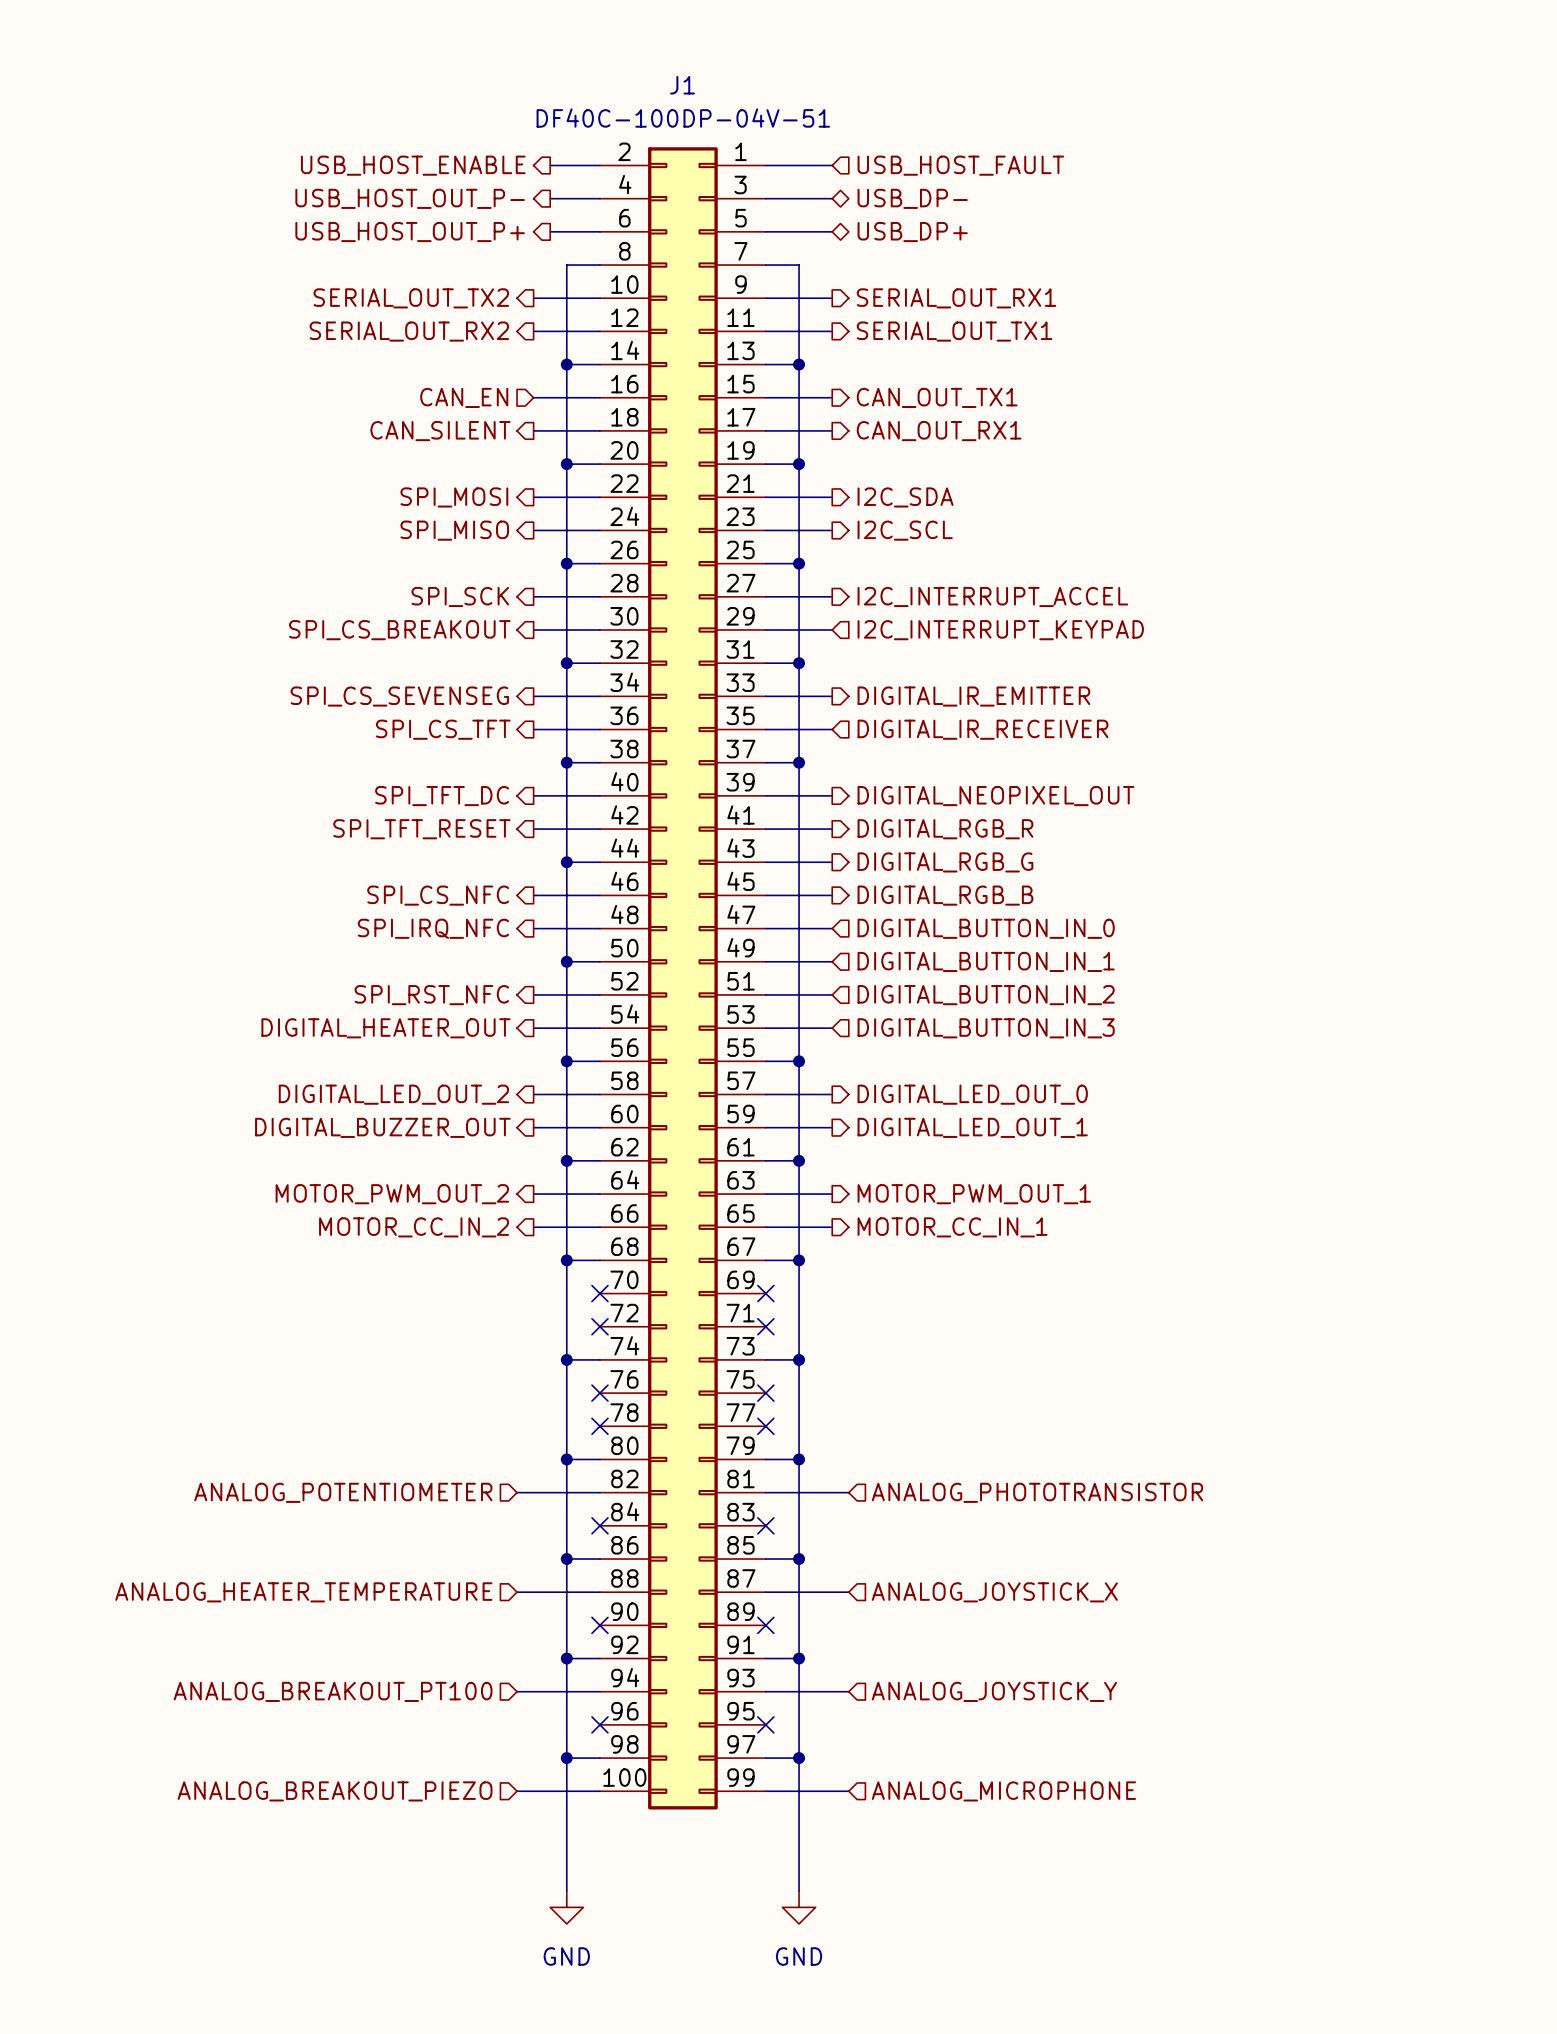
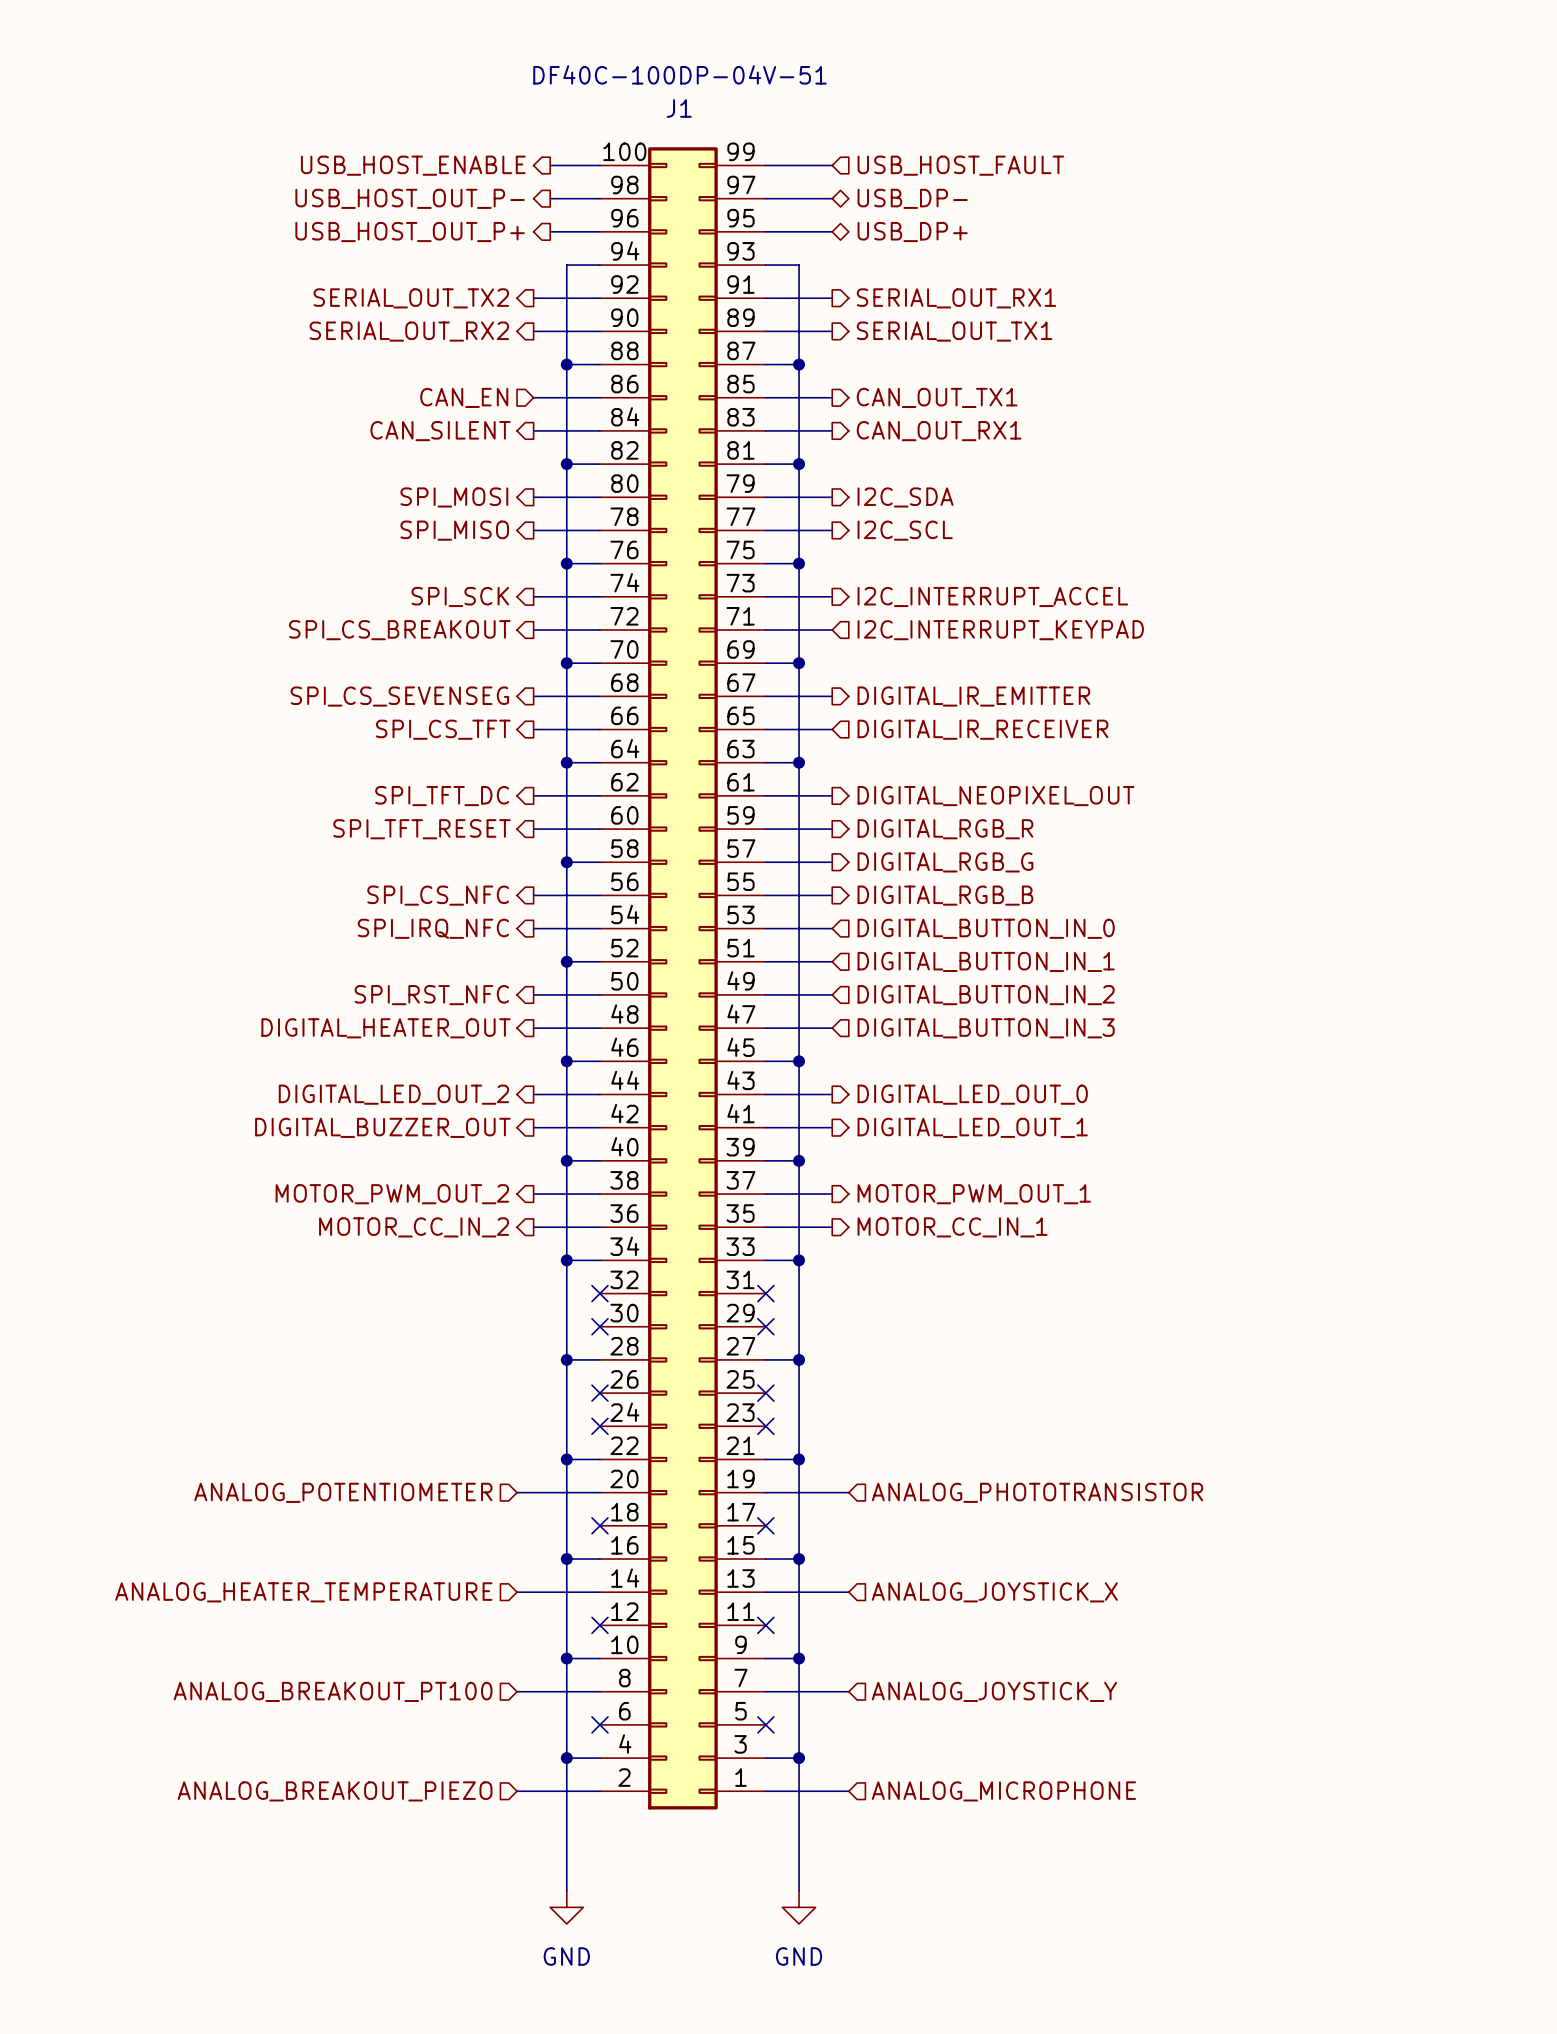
J1 value position: DF40C-100DP-04V-51 (683, 118) -> DF40C-100DP-04V-51 (679, 74)
J1 flip: as is (682, 978) -> up-down (682, 978)

